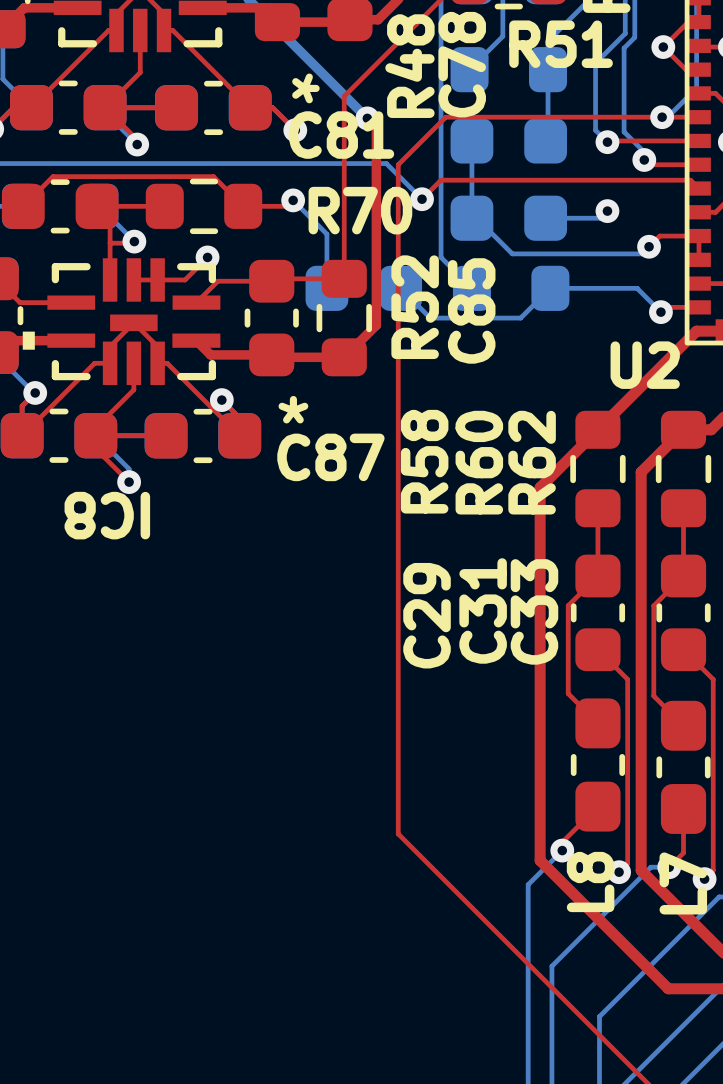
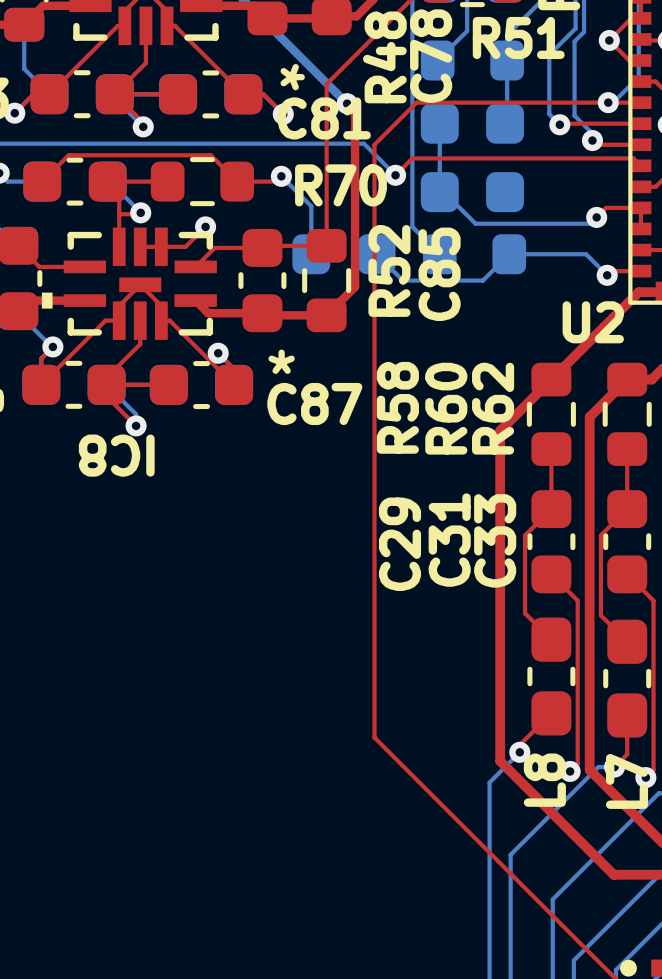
bottom track: (607, 211) (600, 218) (545, 218) -> none
via: (607, 211) -> none

